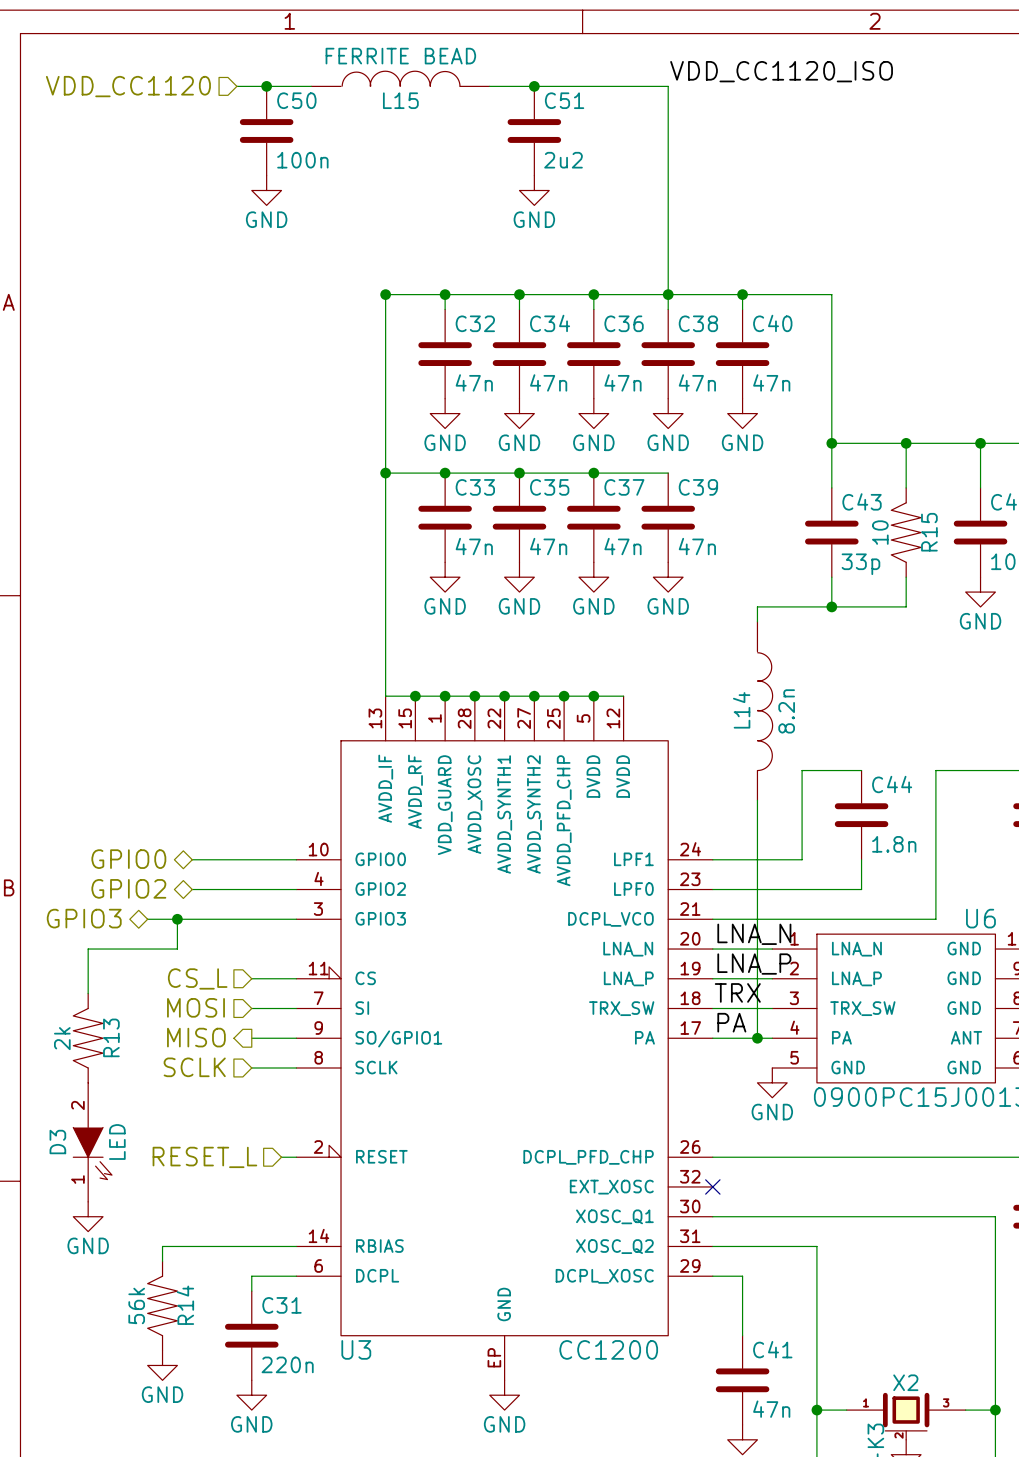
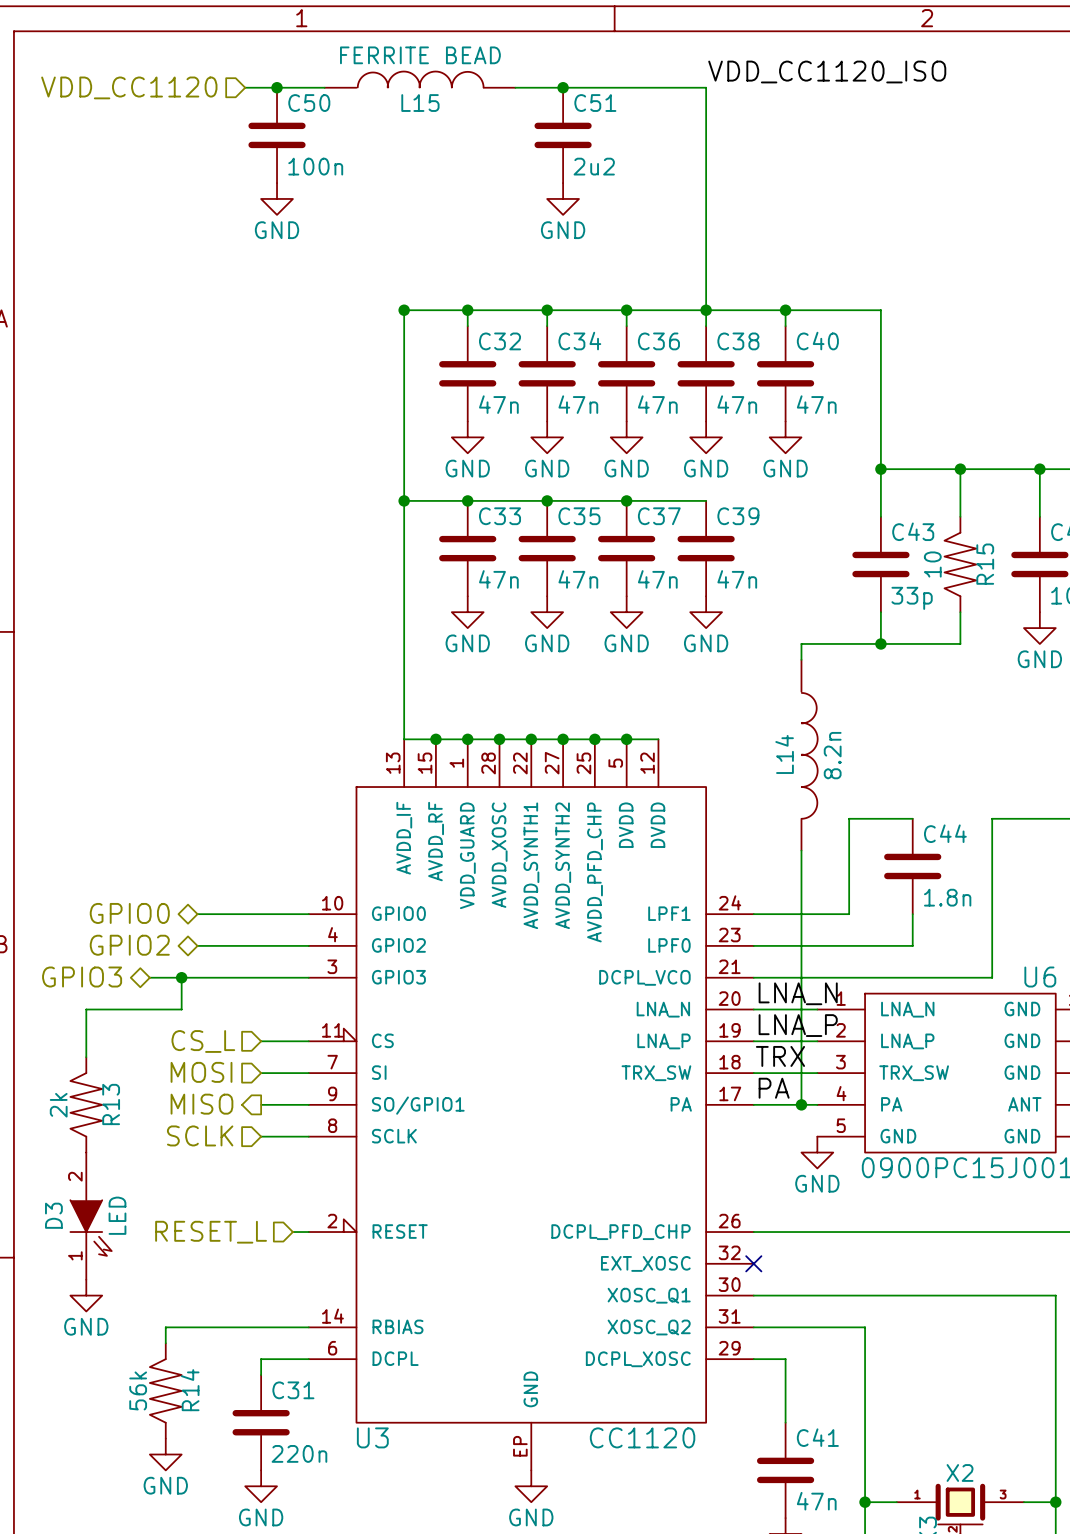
U3 value: CC1200 (608, 1349) -> CC1120 (642, 1437)

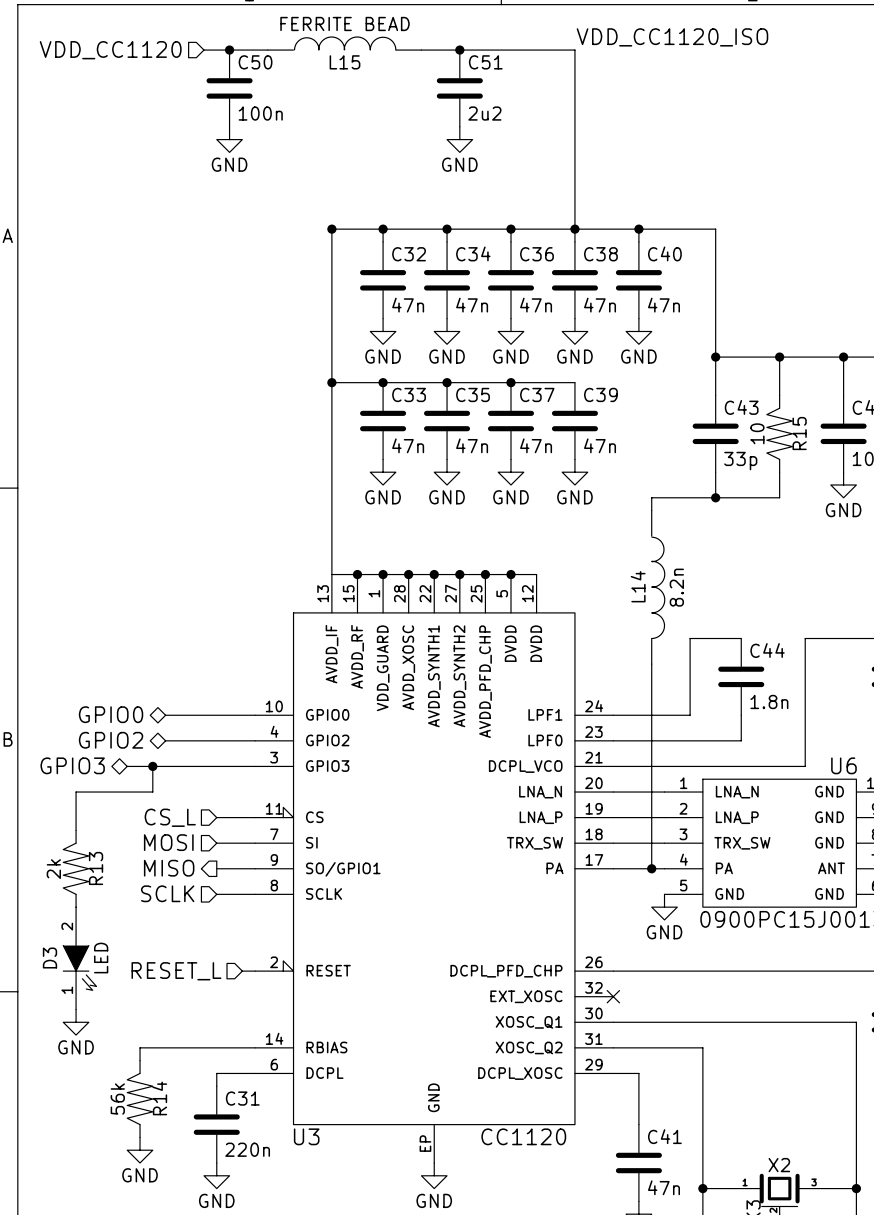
label: LNA_N (798, 993) -> none
label: LNA_P (798, 1025) -> none
label: TRX (780, 1056) -> none
label: PA (774, 1088) -> none

